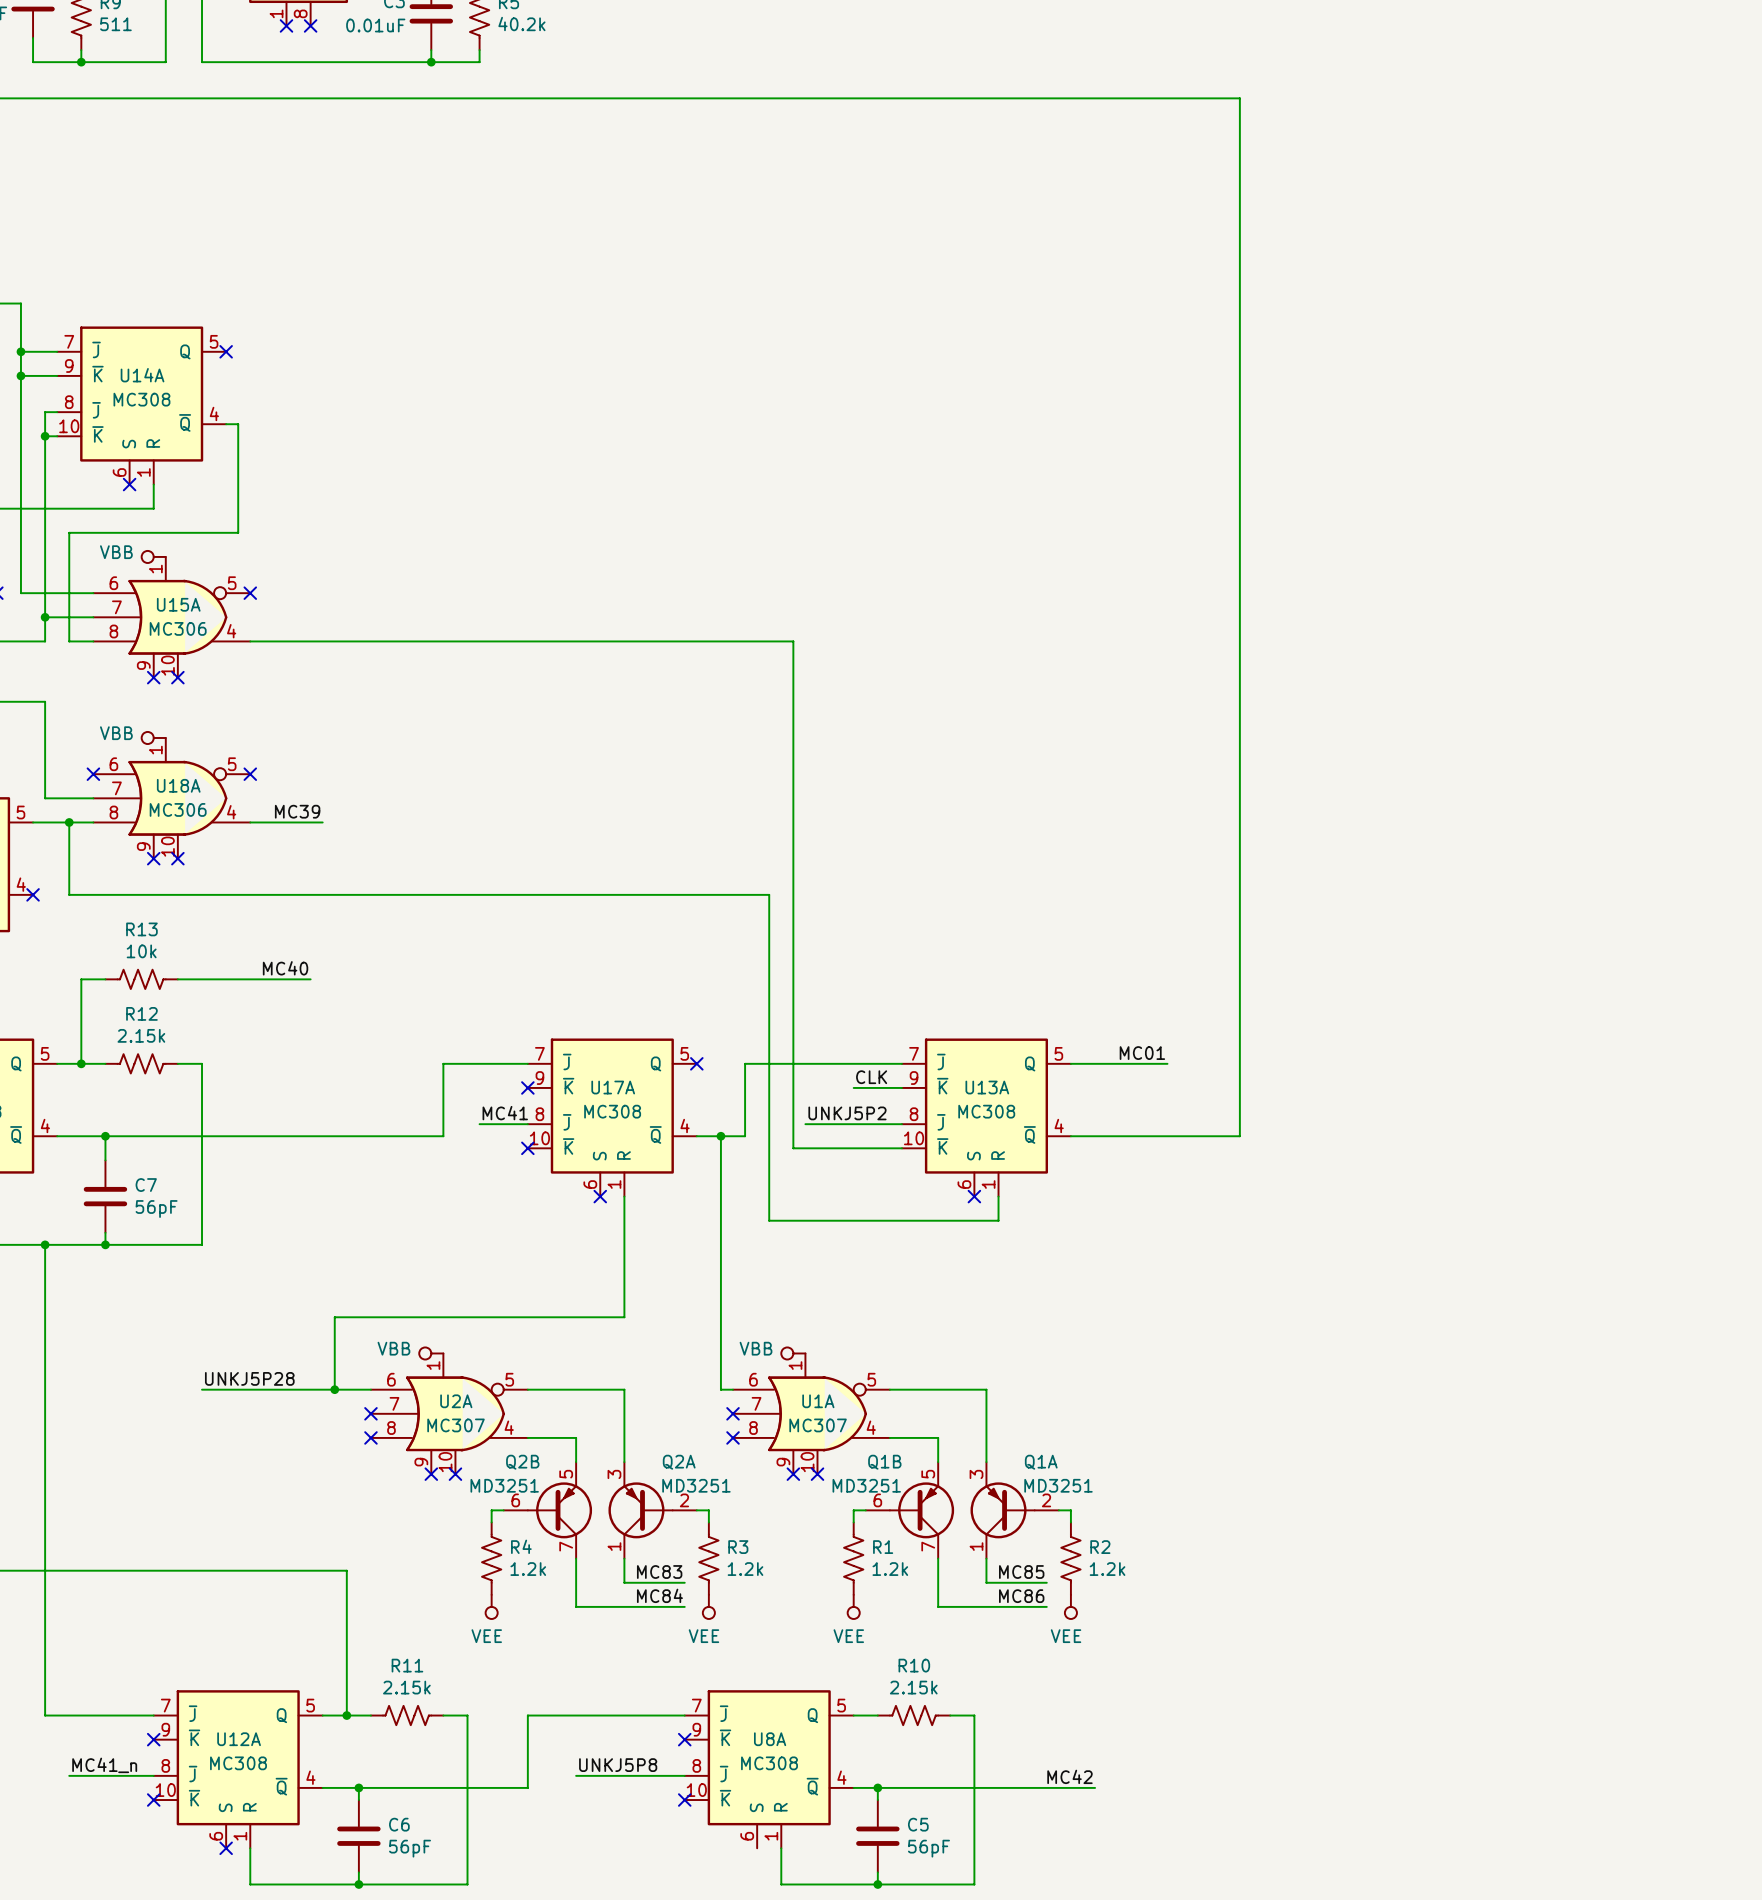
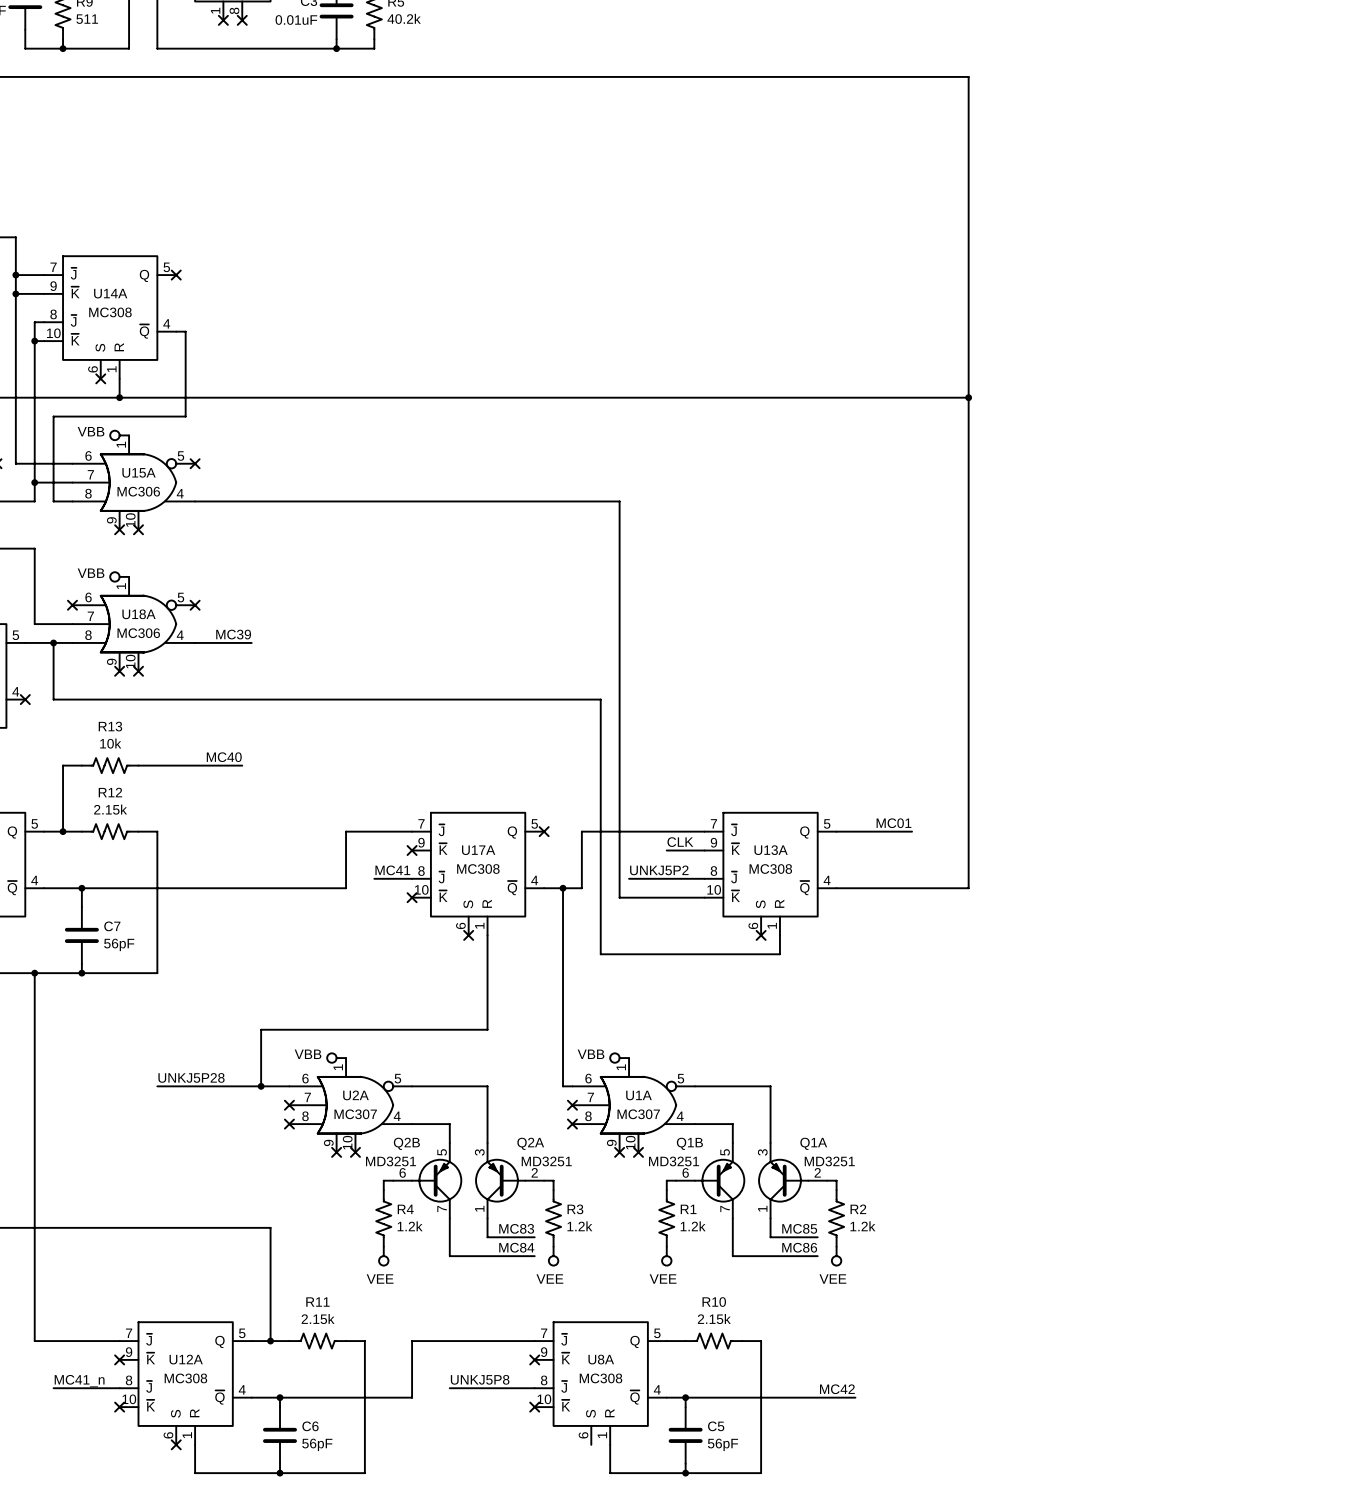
wire: none -> (119, 397) (968, 397)
junction: none -> (119, 397)
junction: none -> (968, 397)

